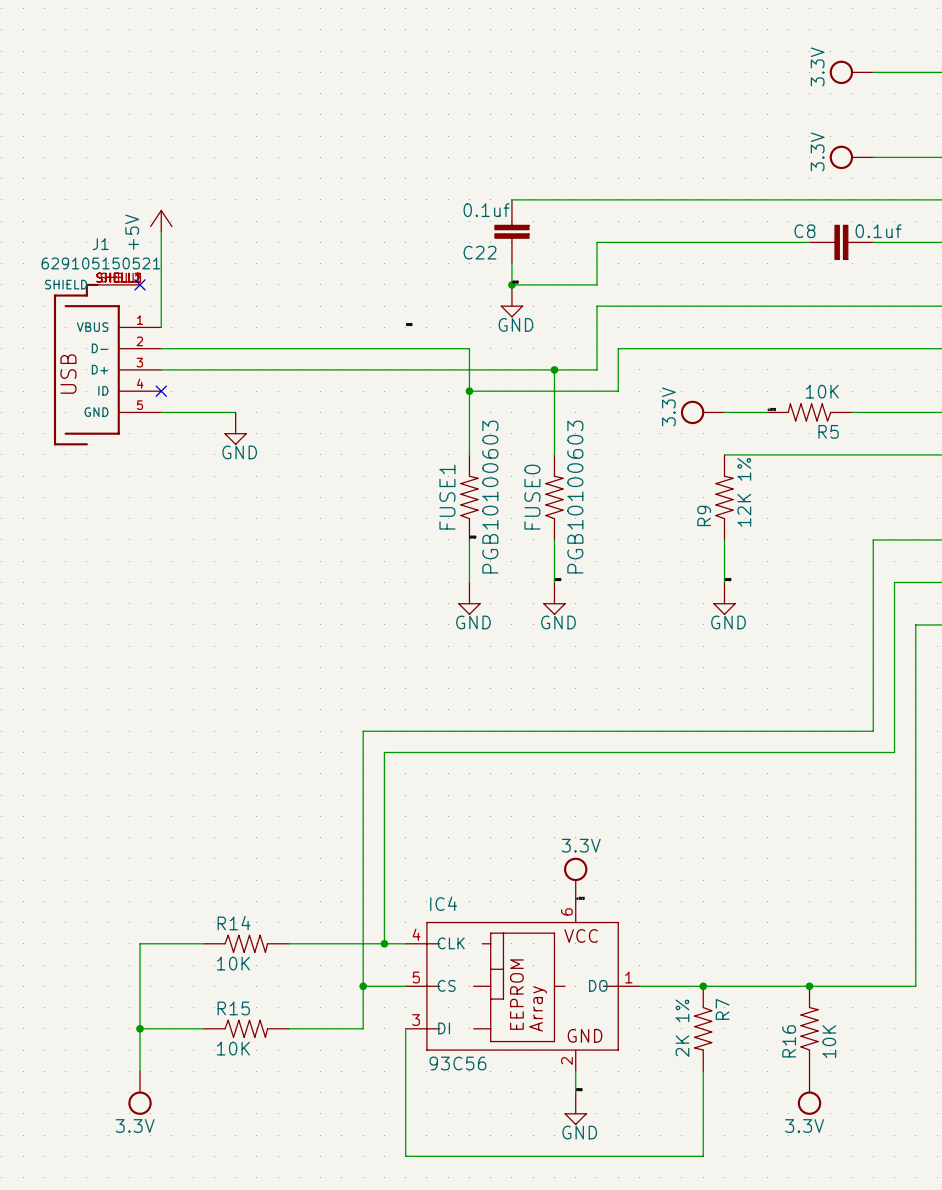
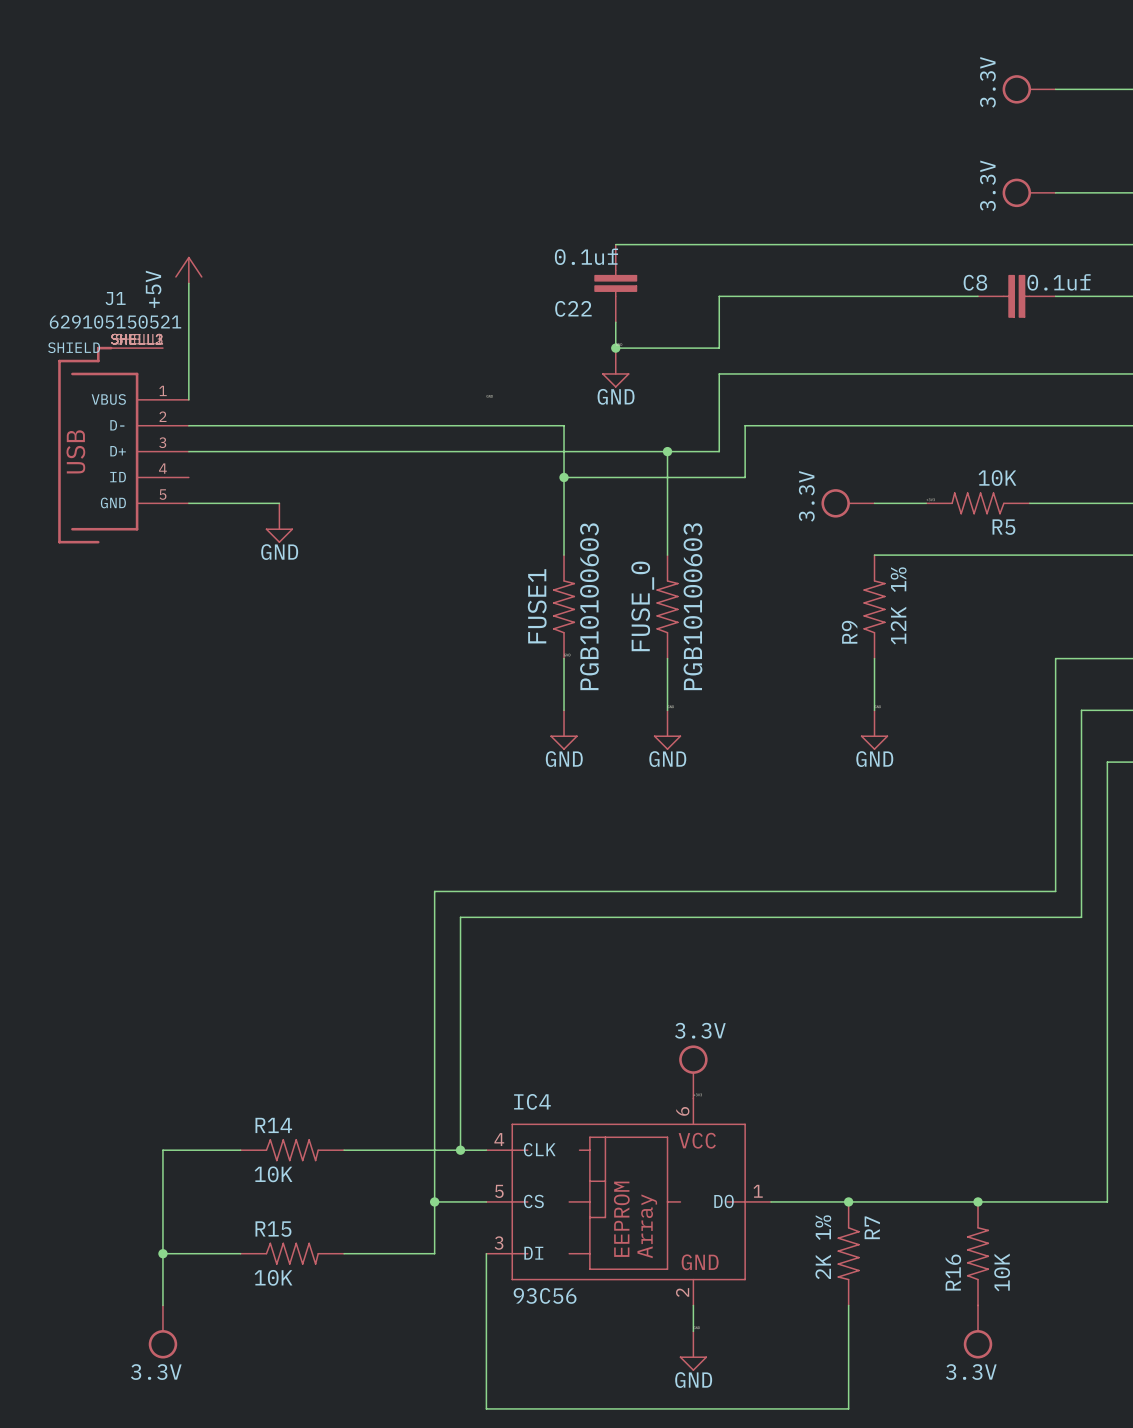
no-connect mark: (140, 284) -> none
no-connect mark: (161, 391) -> none
FUSE0 name: FUSE0 (532, 497) -> FUSE_0 (642, 606)

